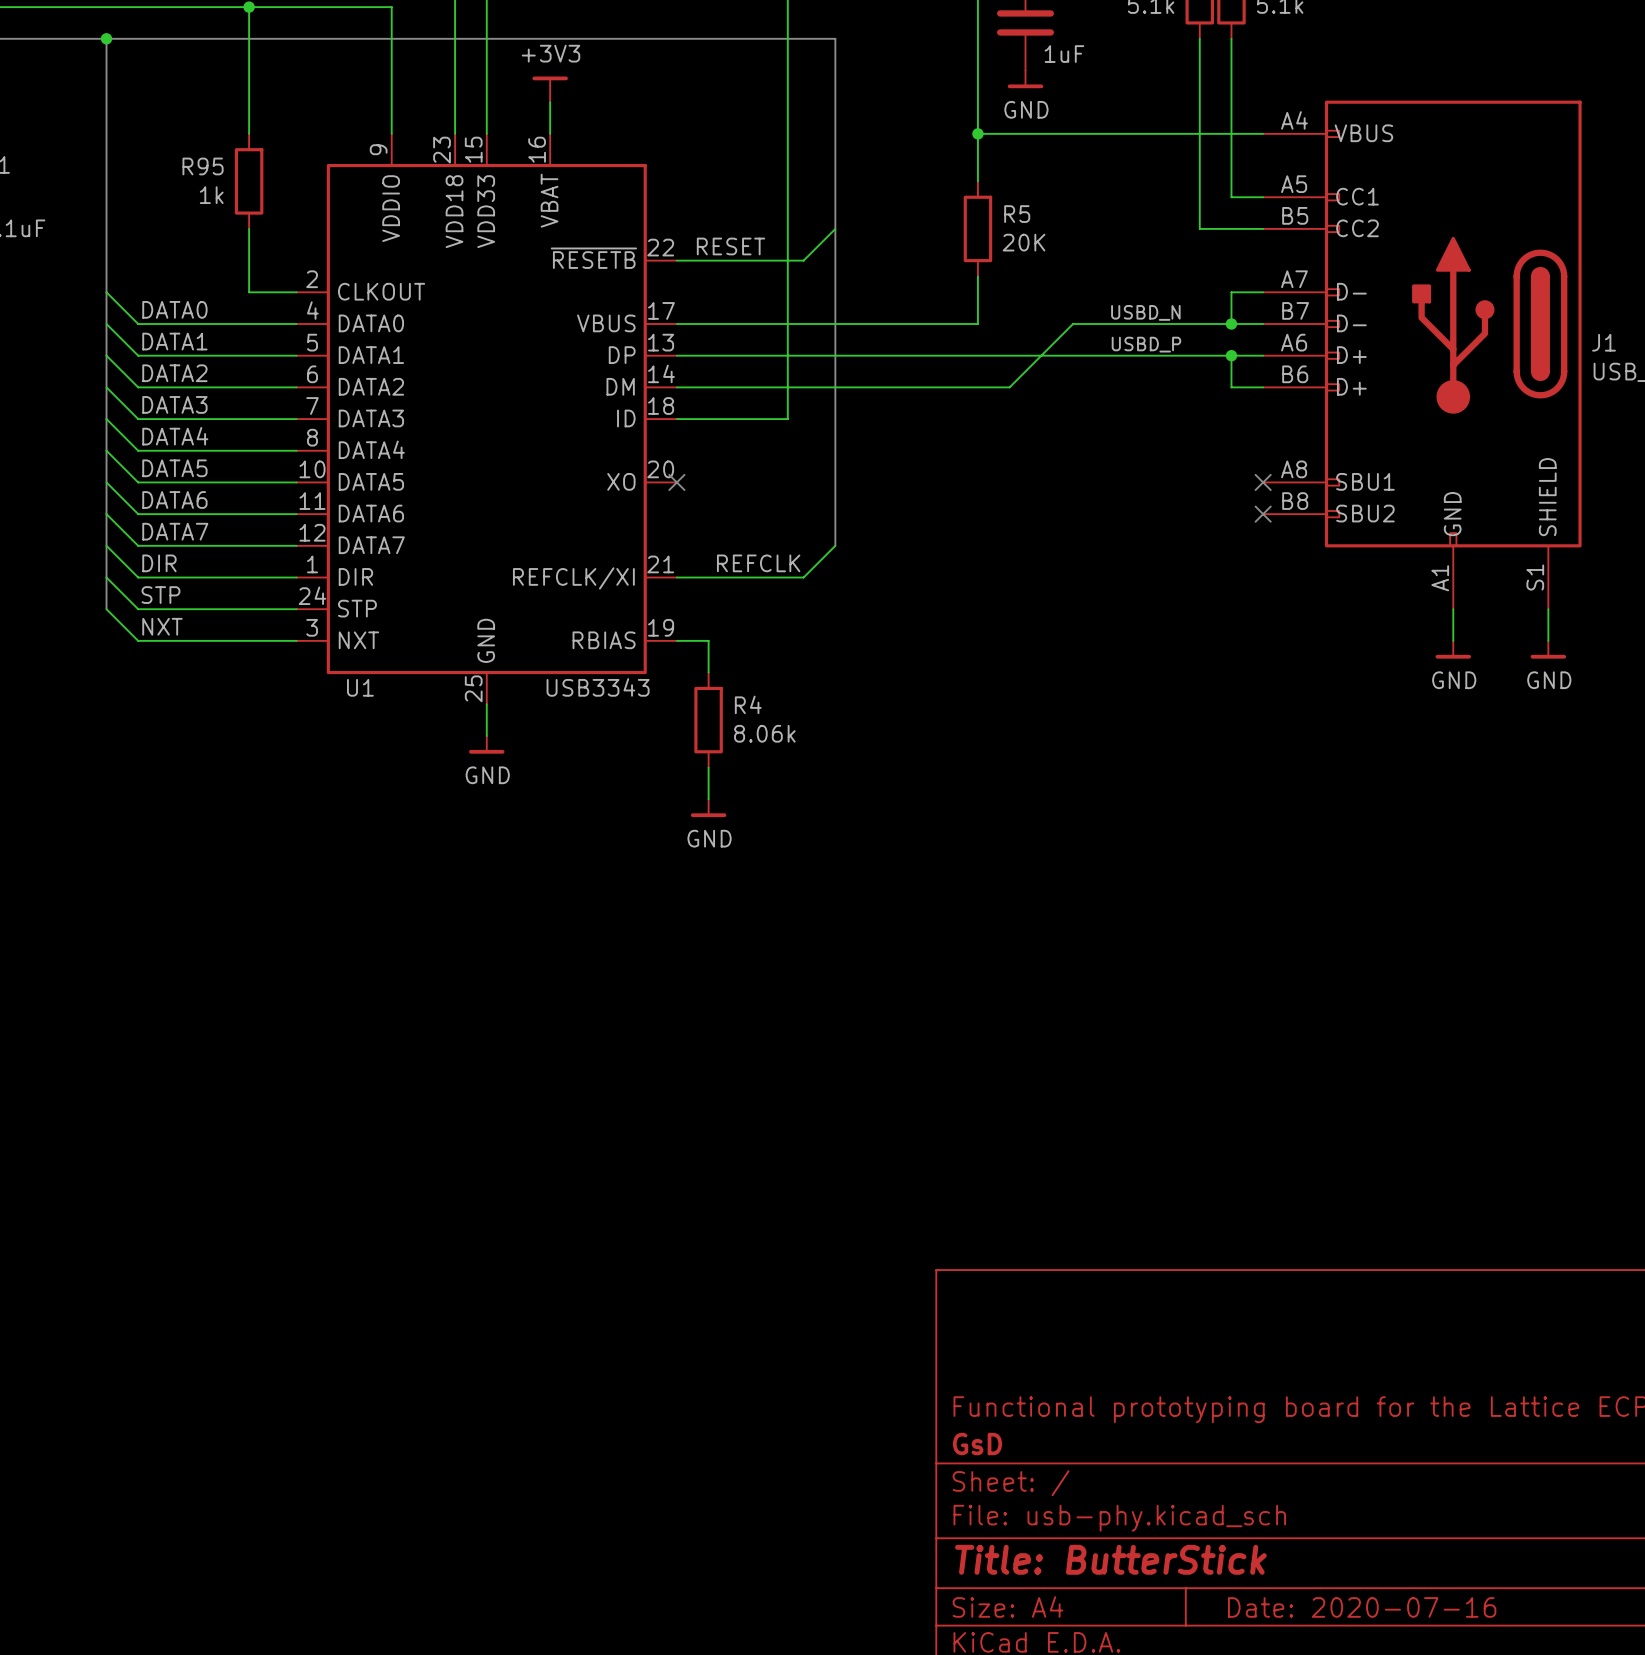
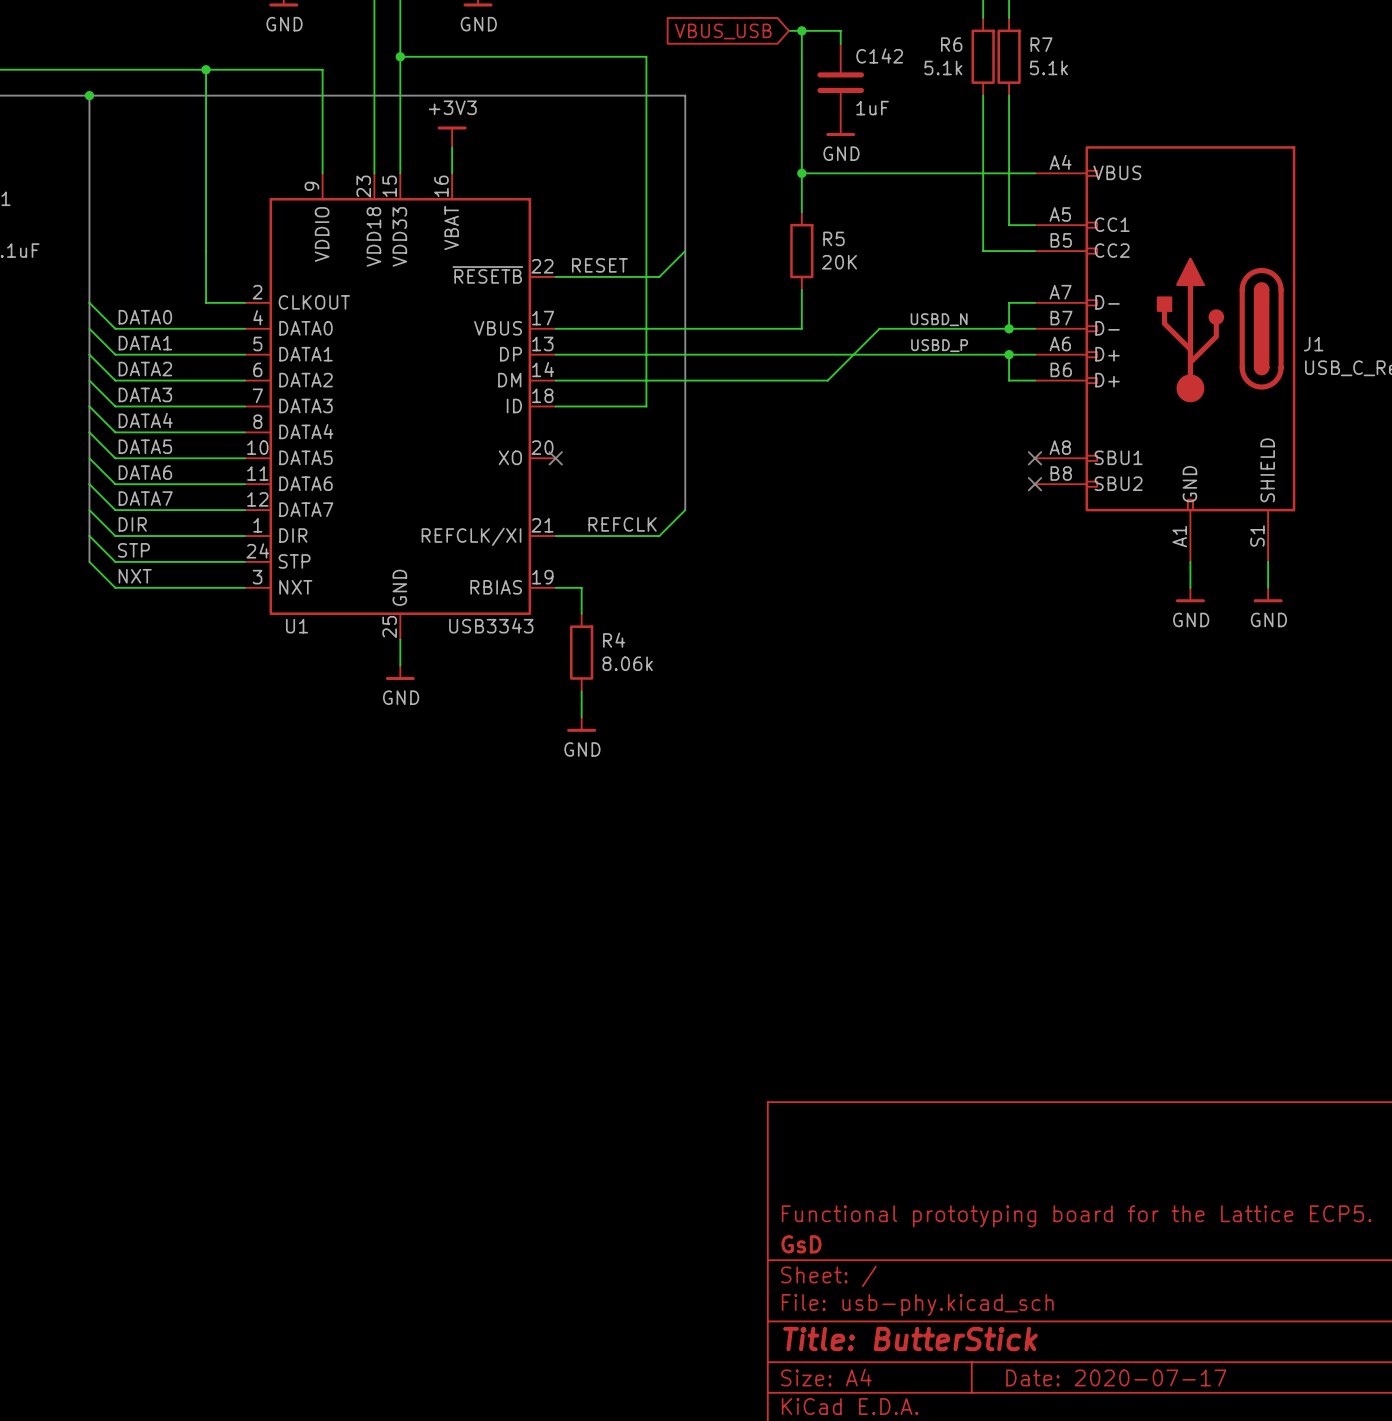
wire: none -> (206, 173) (206, 251)
R95: 1k (249, 181) -> none
title block: Date: 2020-07-16 (1362, 1607) -> Date: 2020-07-17 (1116, 1377)

